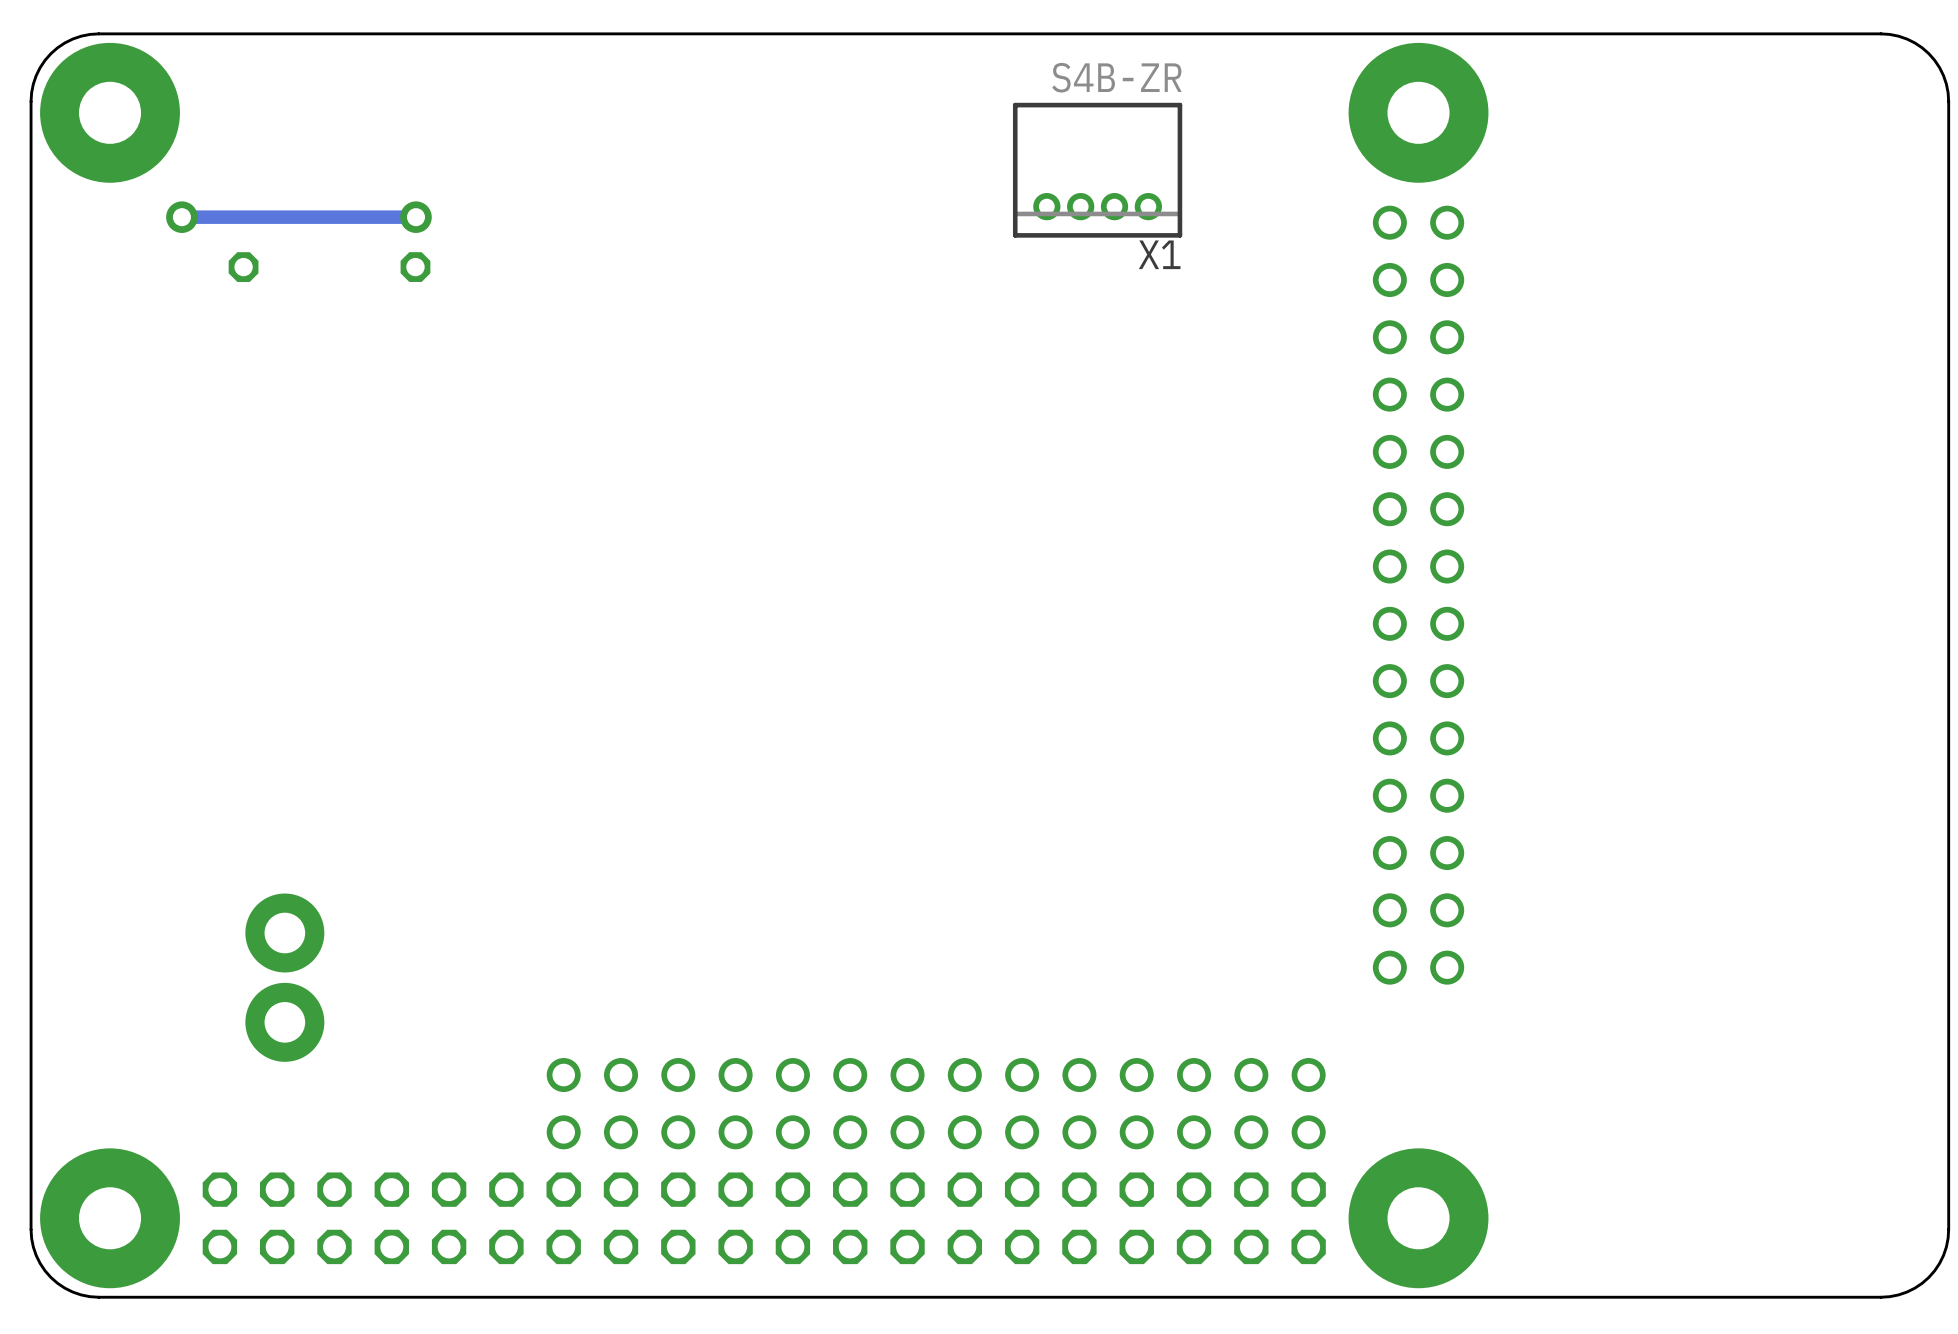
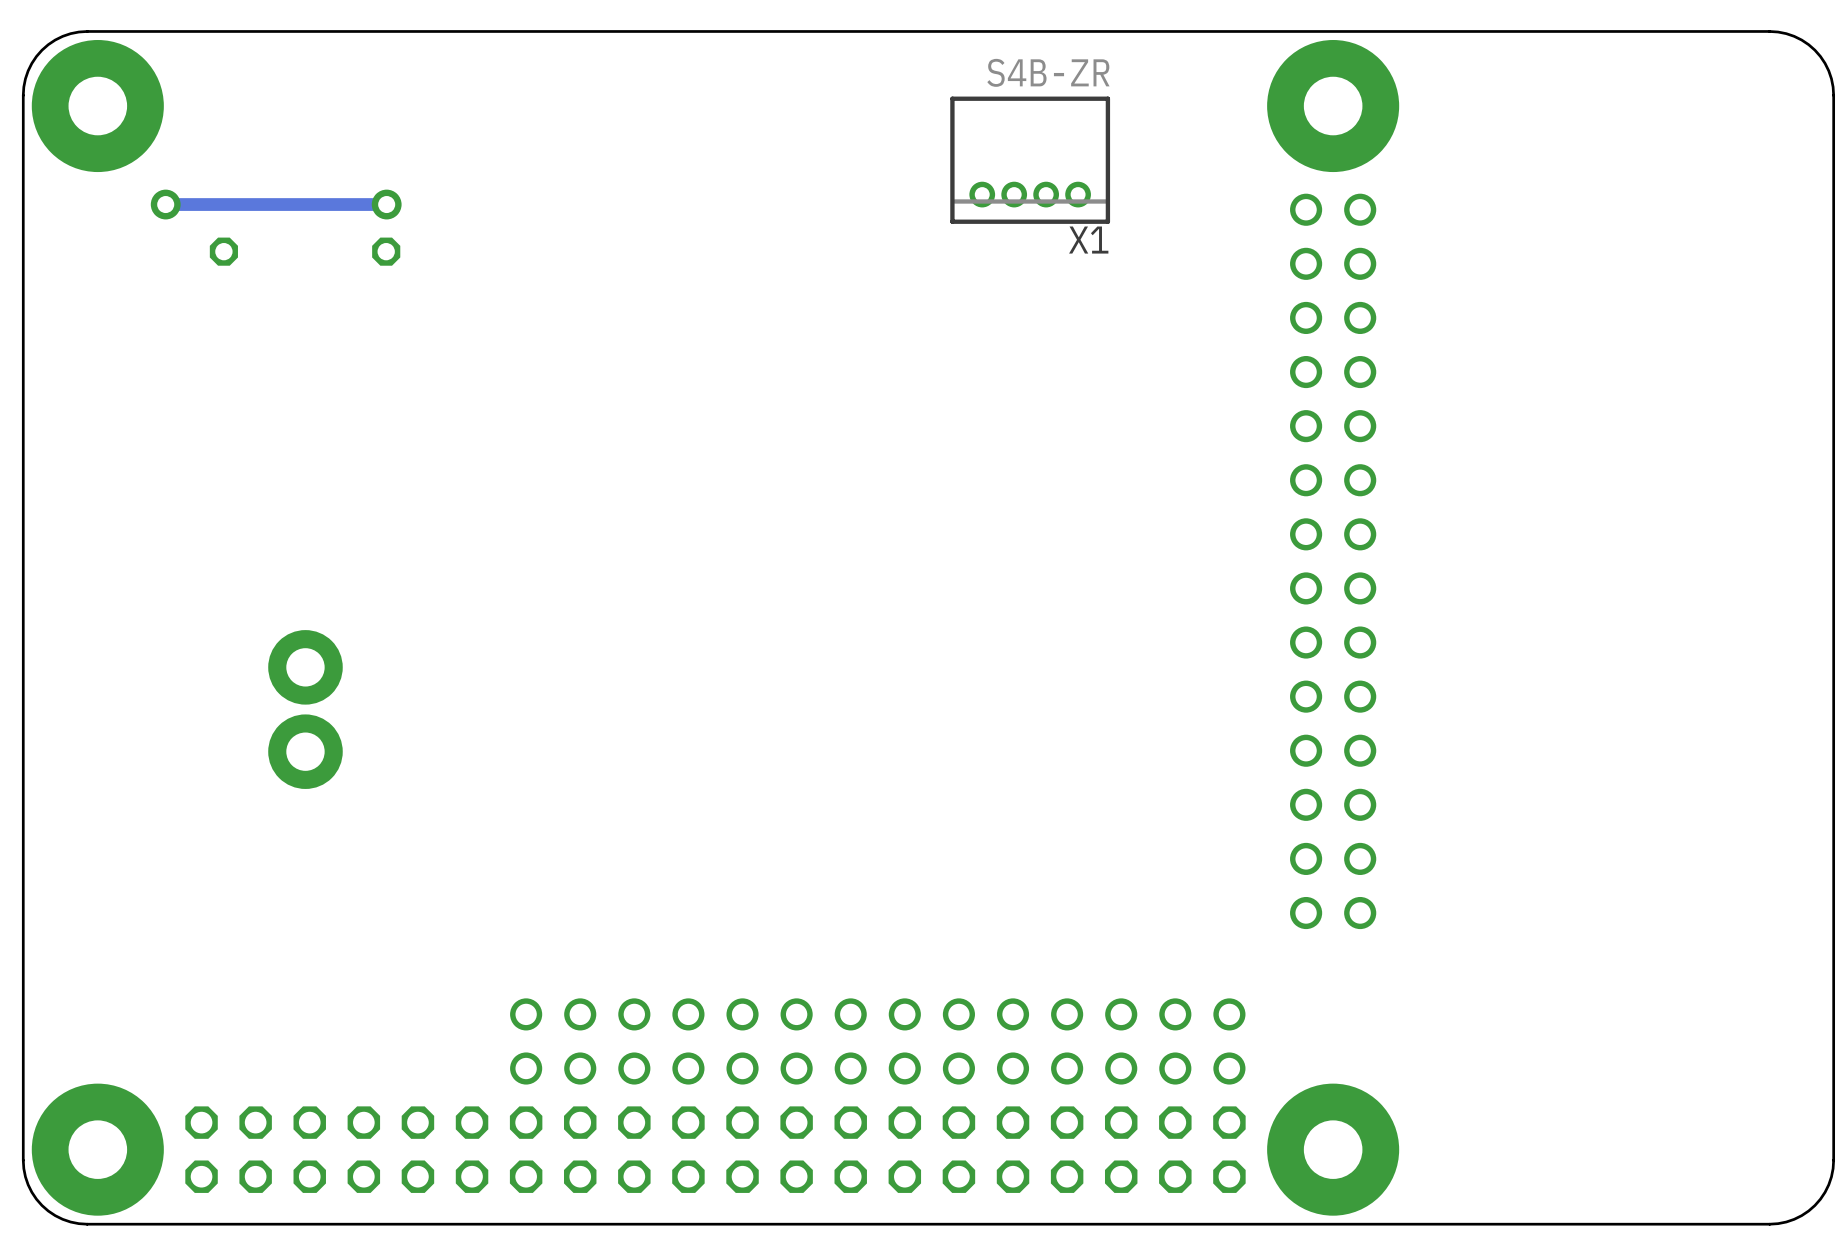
part position: (284, 977) -> (305, 709)

